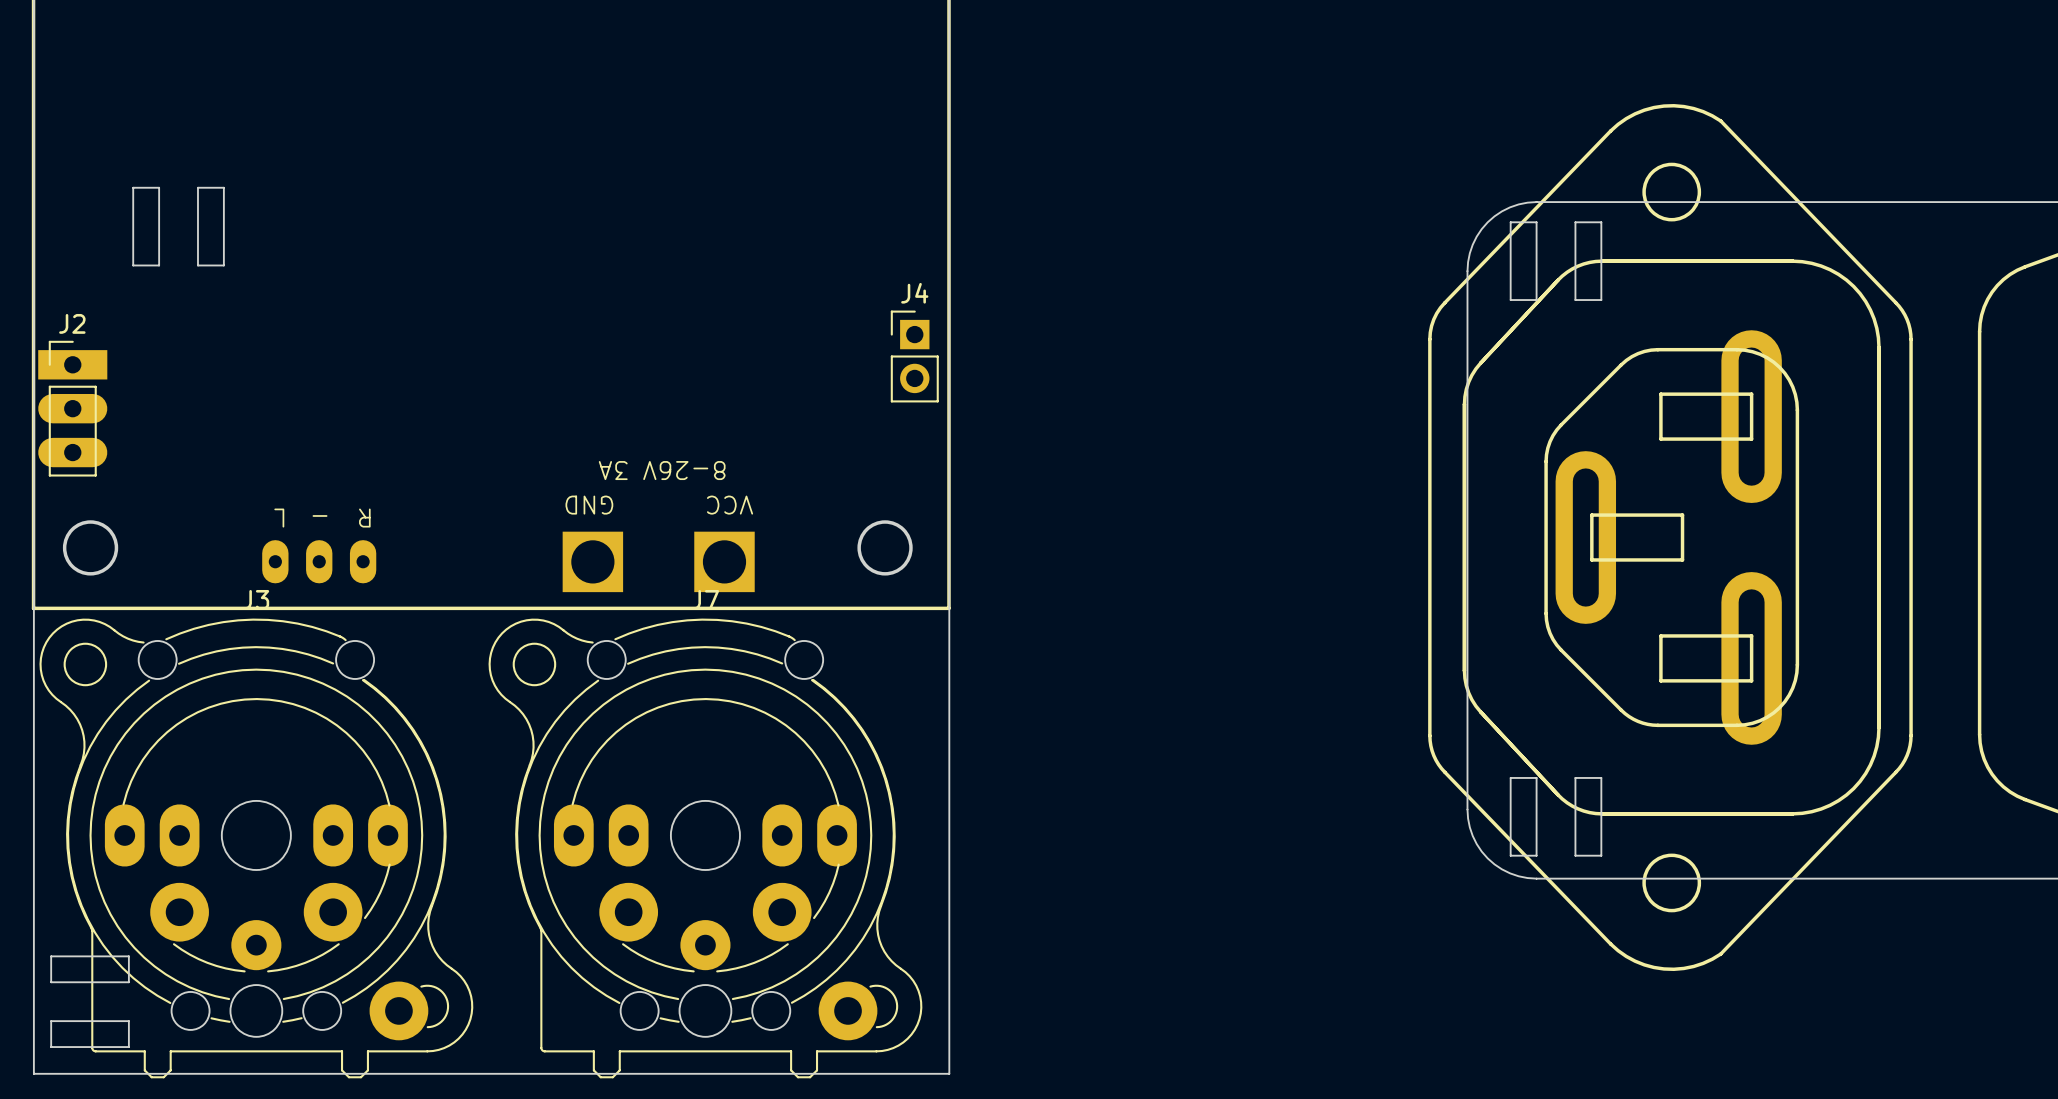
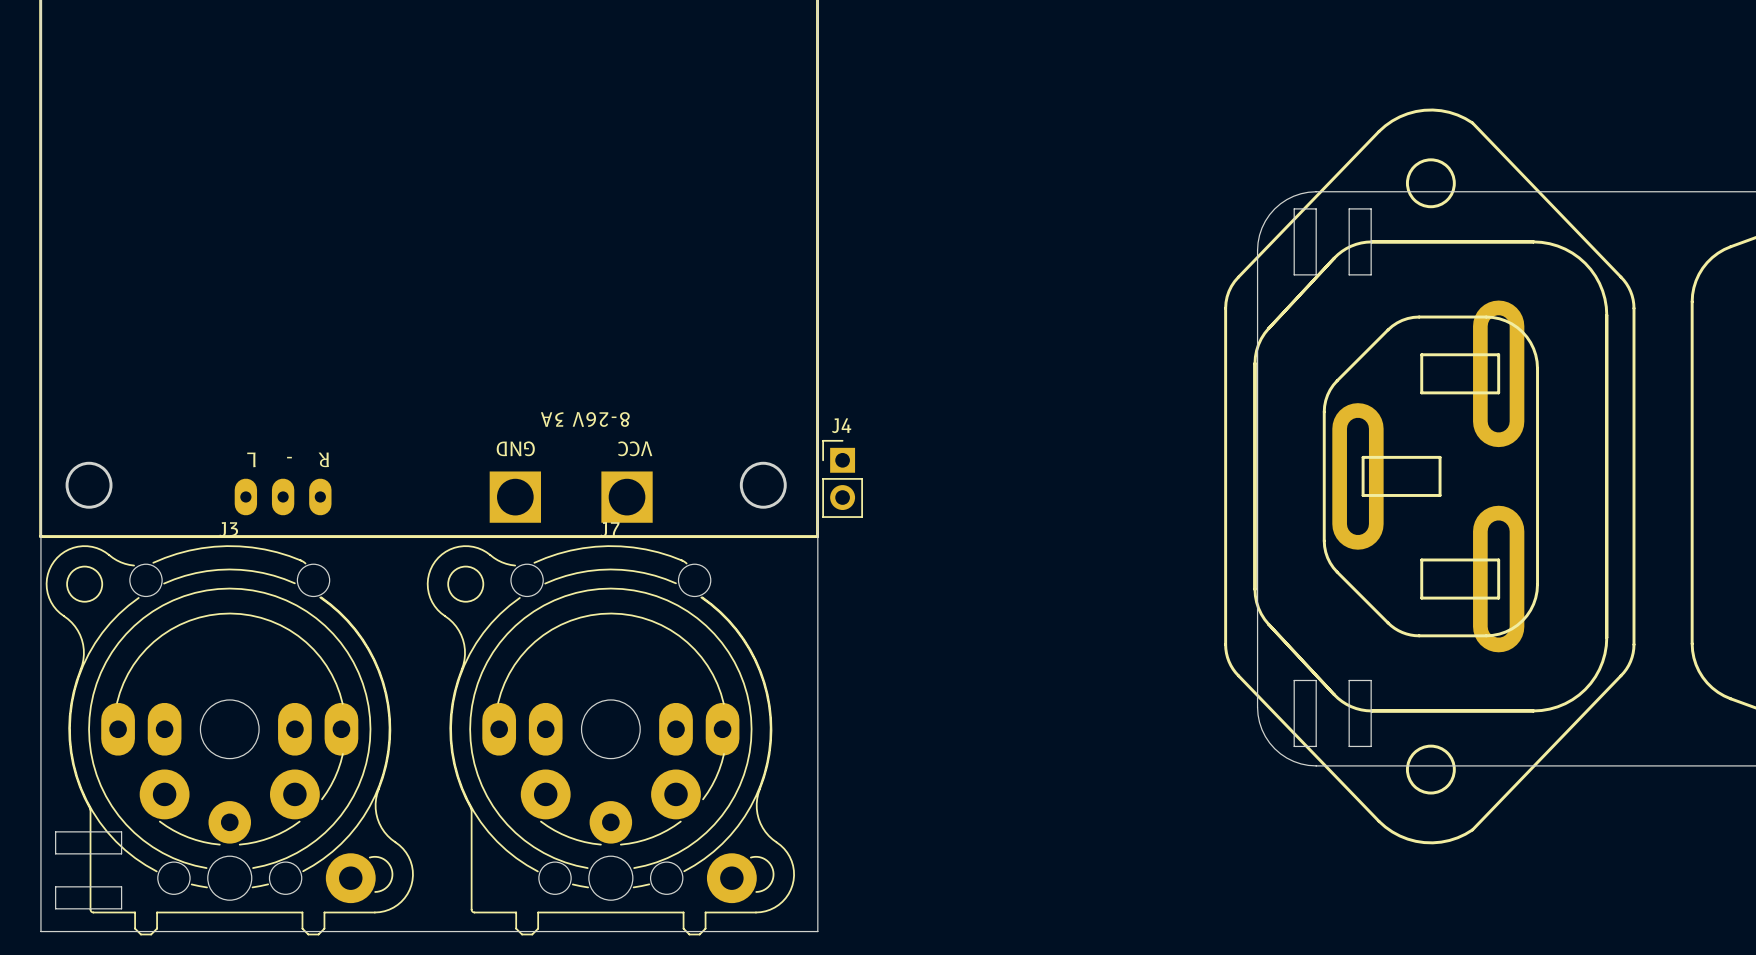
board edge: (133, 187) (159, 187) (159, 265) (133, 265) (133, 187) -> none
board edge: (197, 187) (223, 187) (223, 265) (197, 265) (197, 187) -> none
J4 position: (914, 356) -> (842, 478)
J2: (72, 408) -> none

